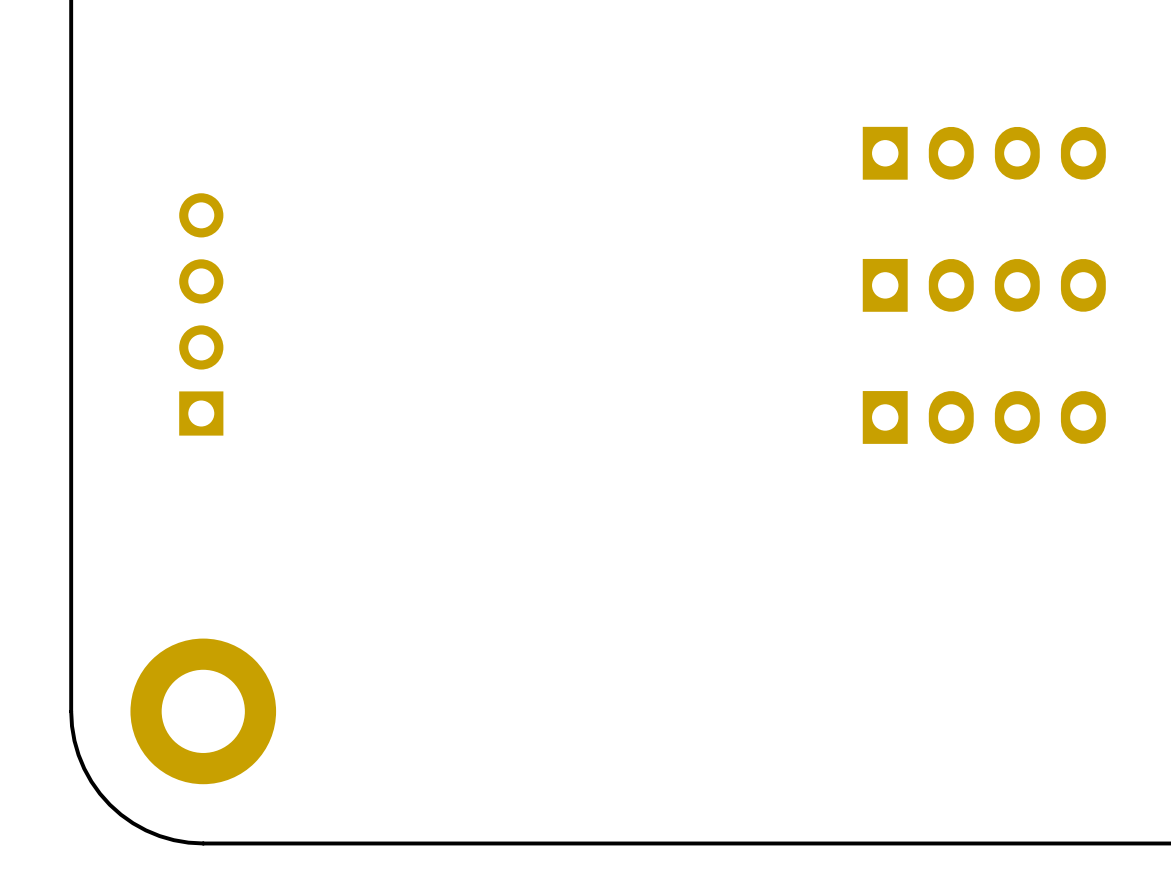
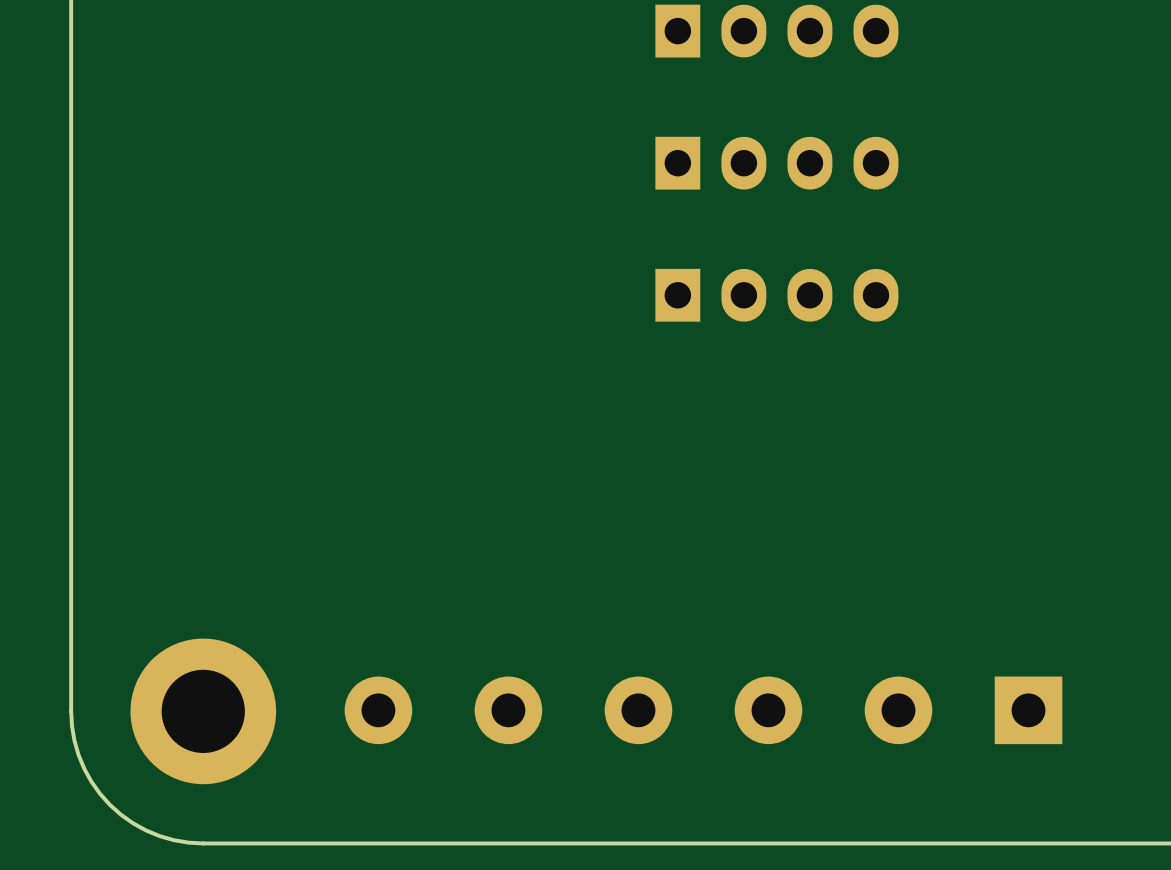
part: none -> (776, 31)
part: (984, 153) -> none
part: none -> (776, 163)
part: (984, 285) -> none
part: none -> (776, 295)
part: (201, 314) -> none
part: (984, 417) -> none
part: none -> (703, 710)

